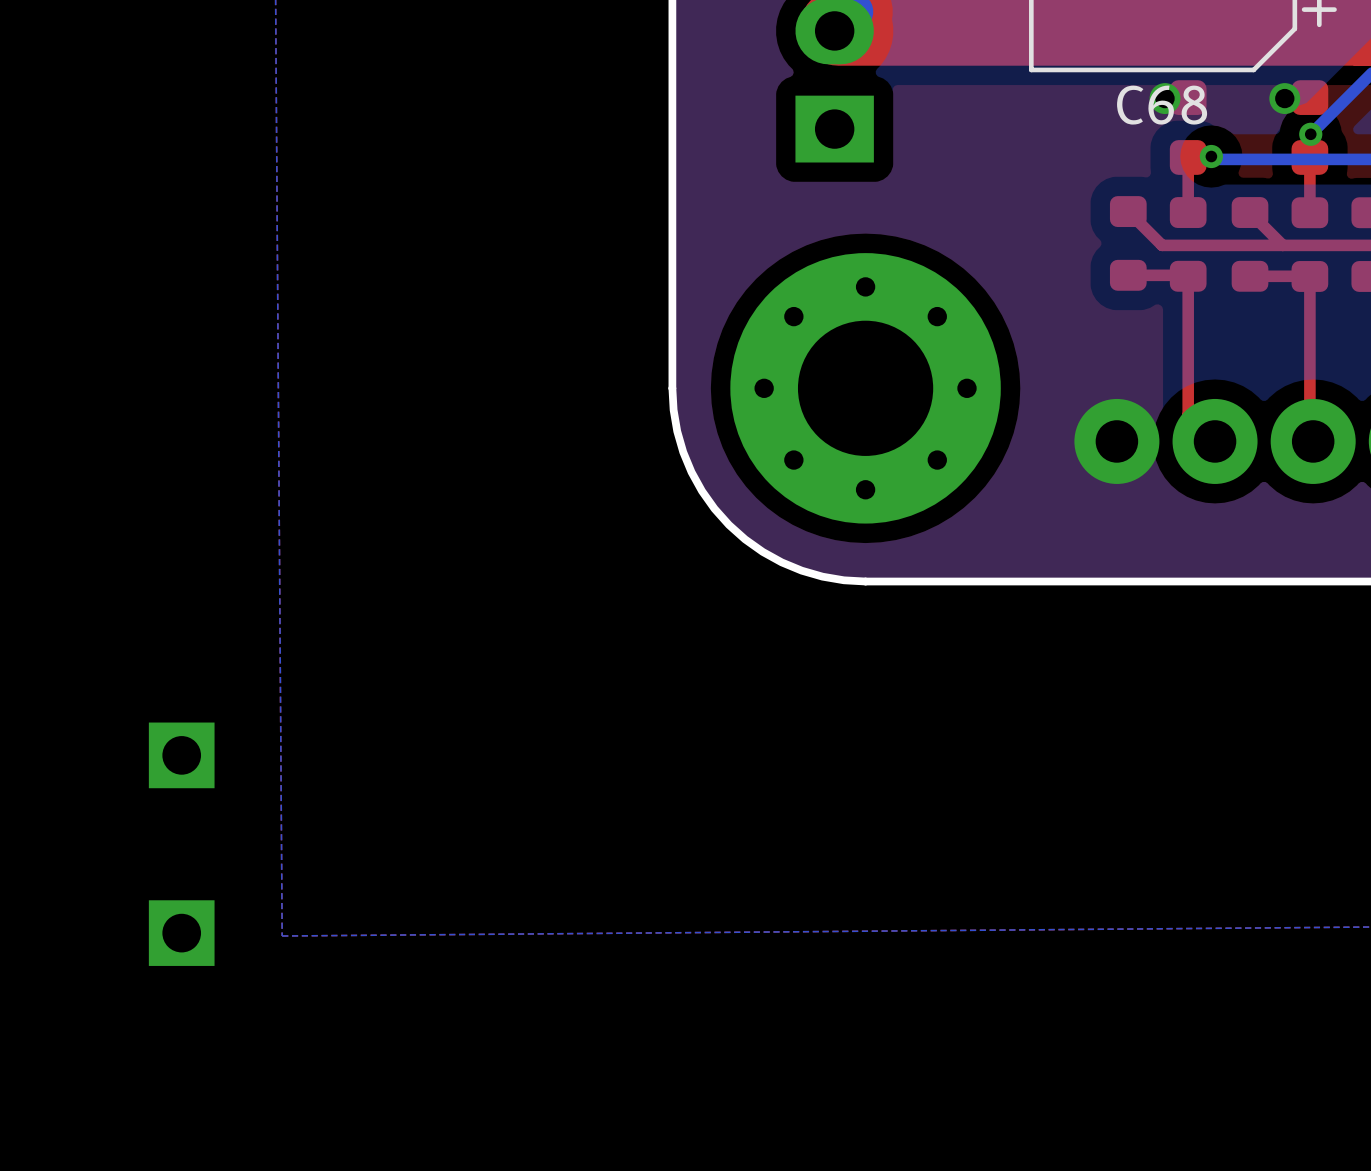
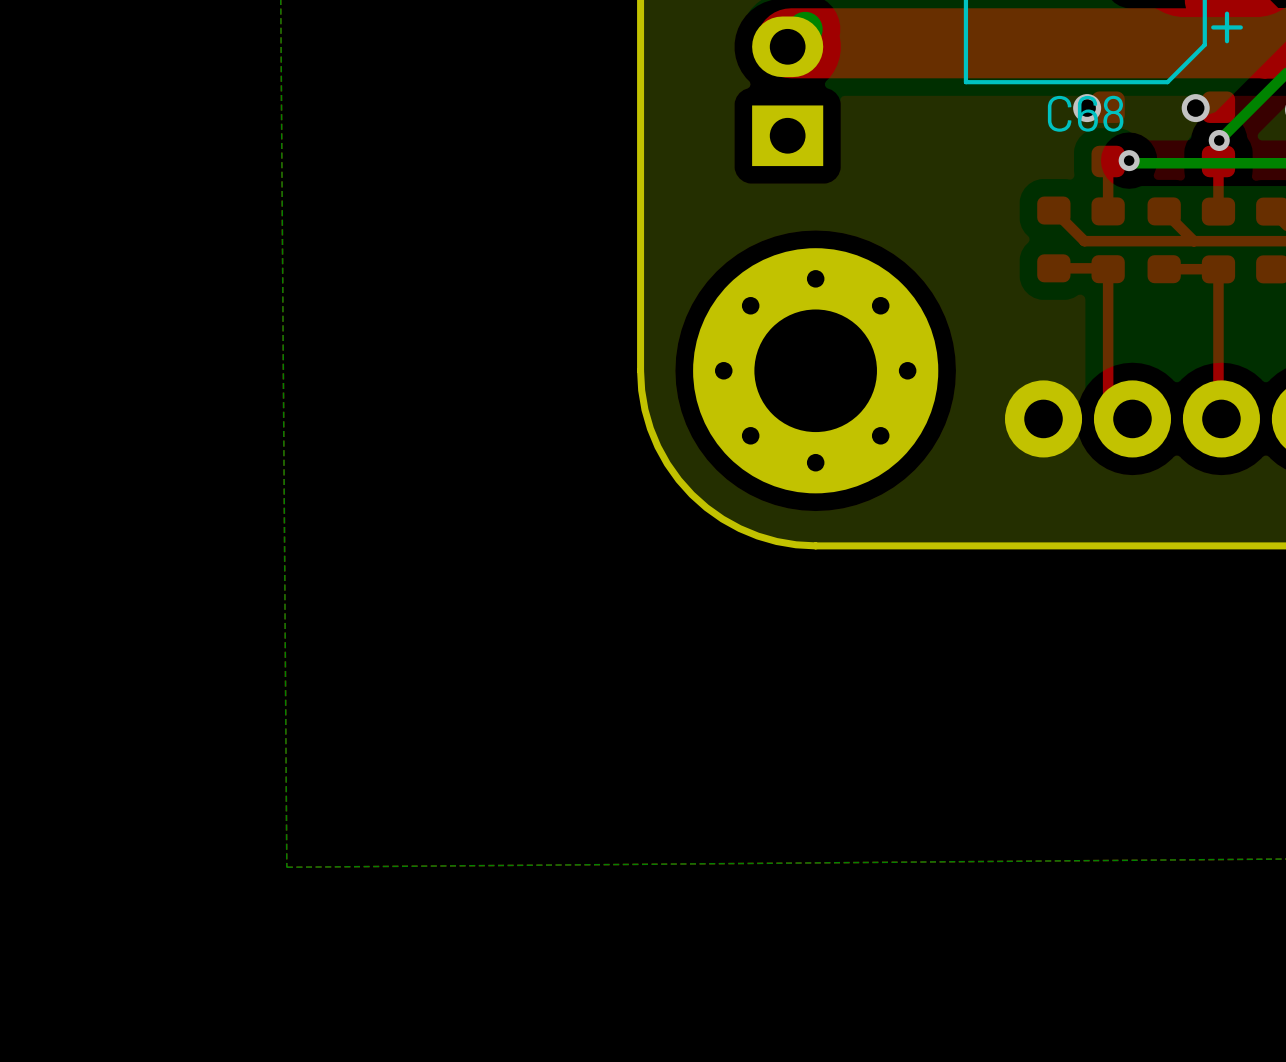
part: (181, 755) -> none
part: (181, 933) -> none

